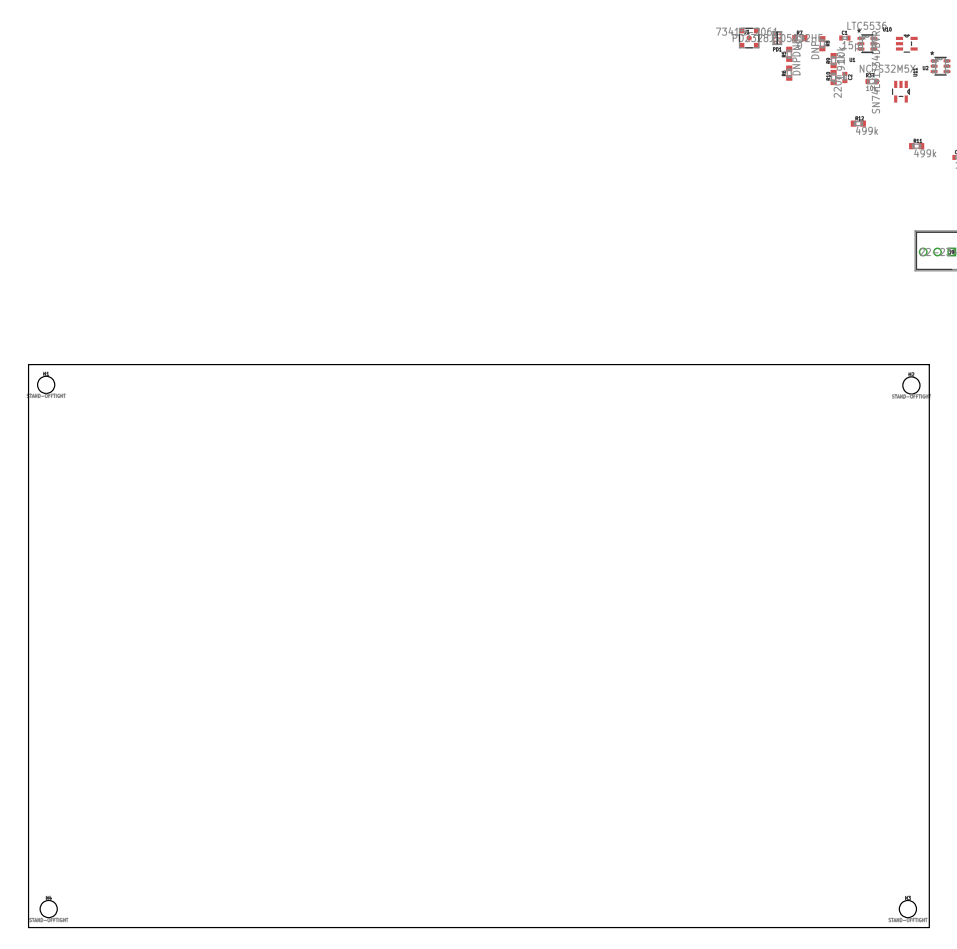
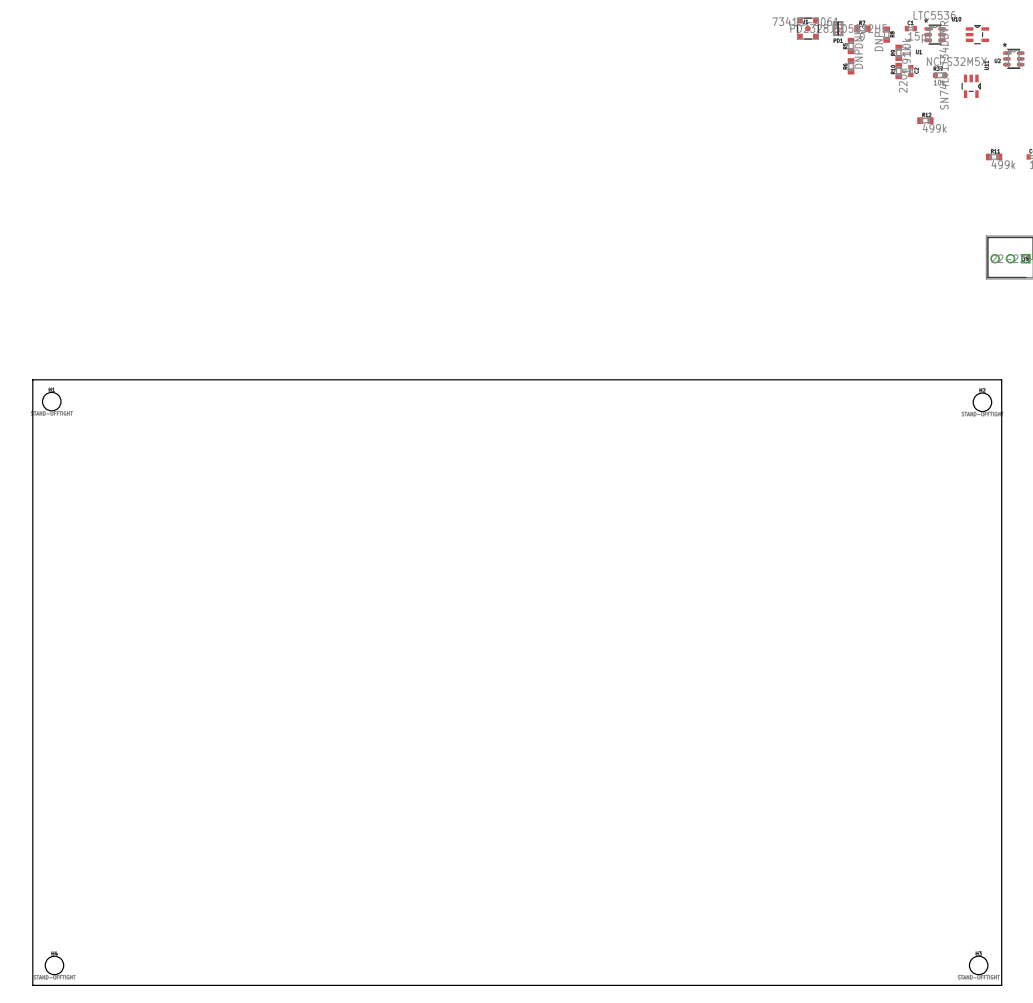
part position: (916, 146) -> (994, 156)

